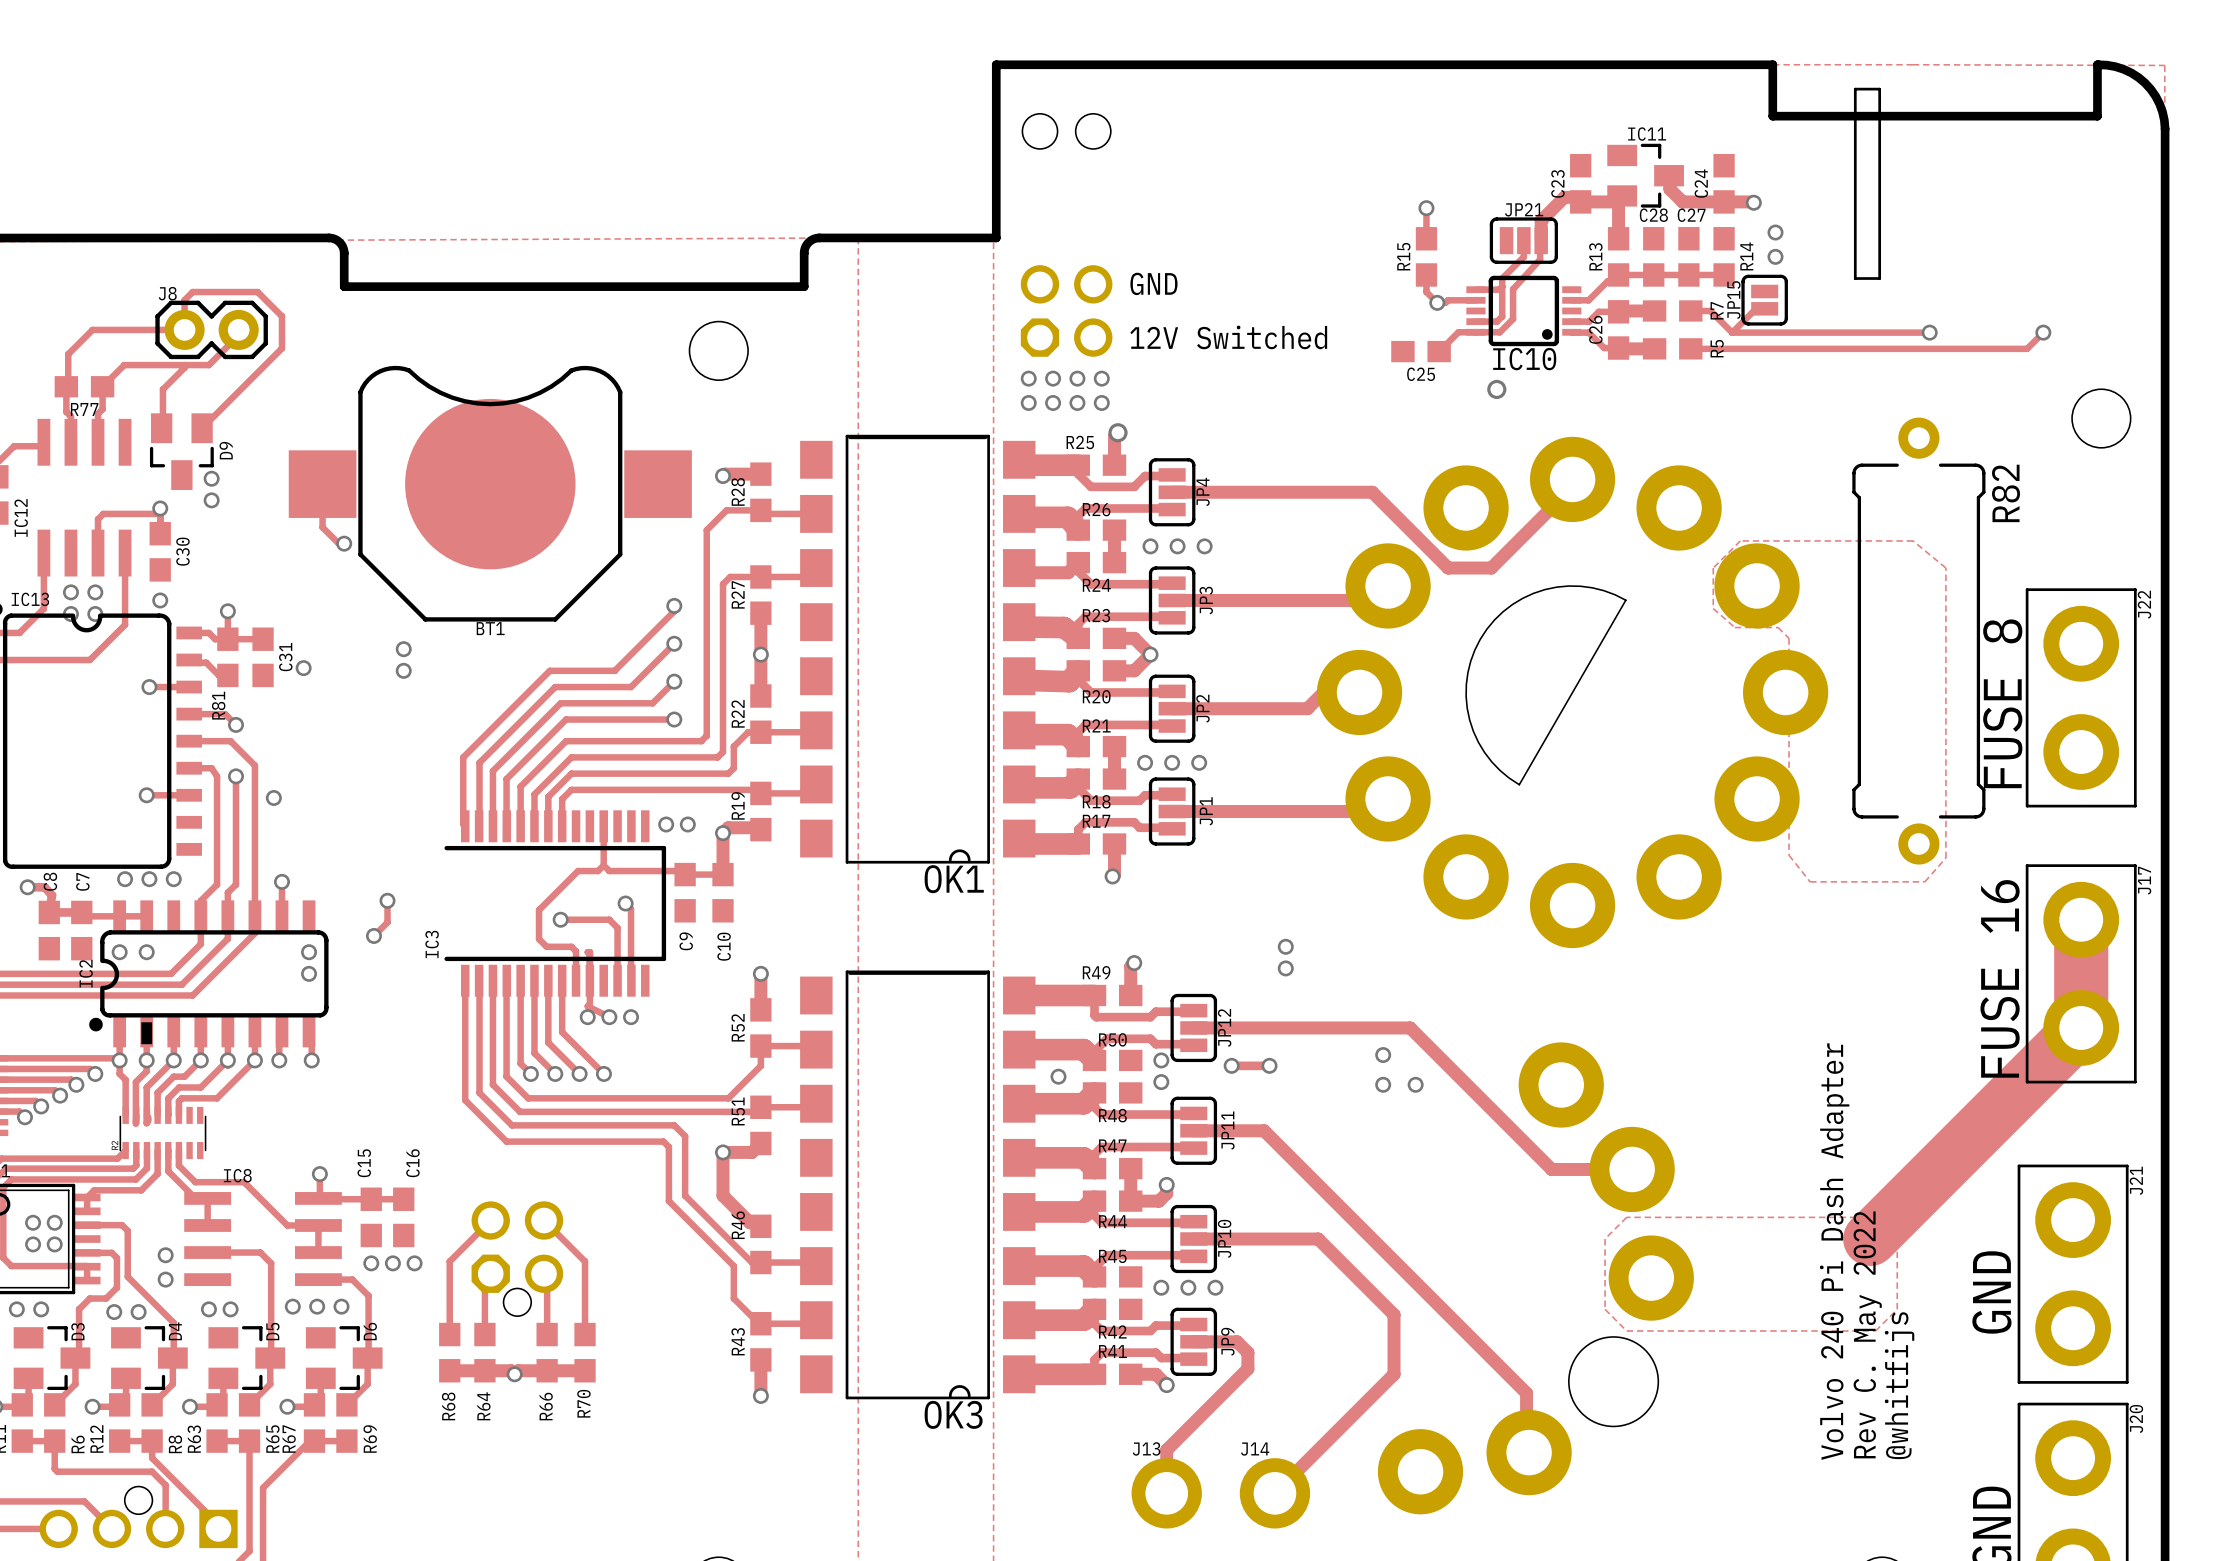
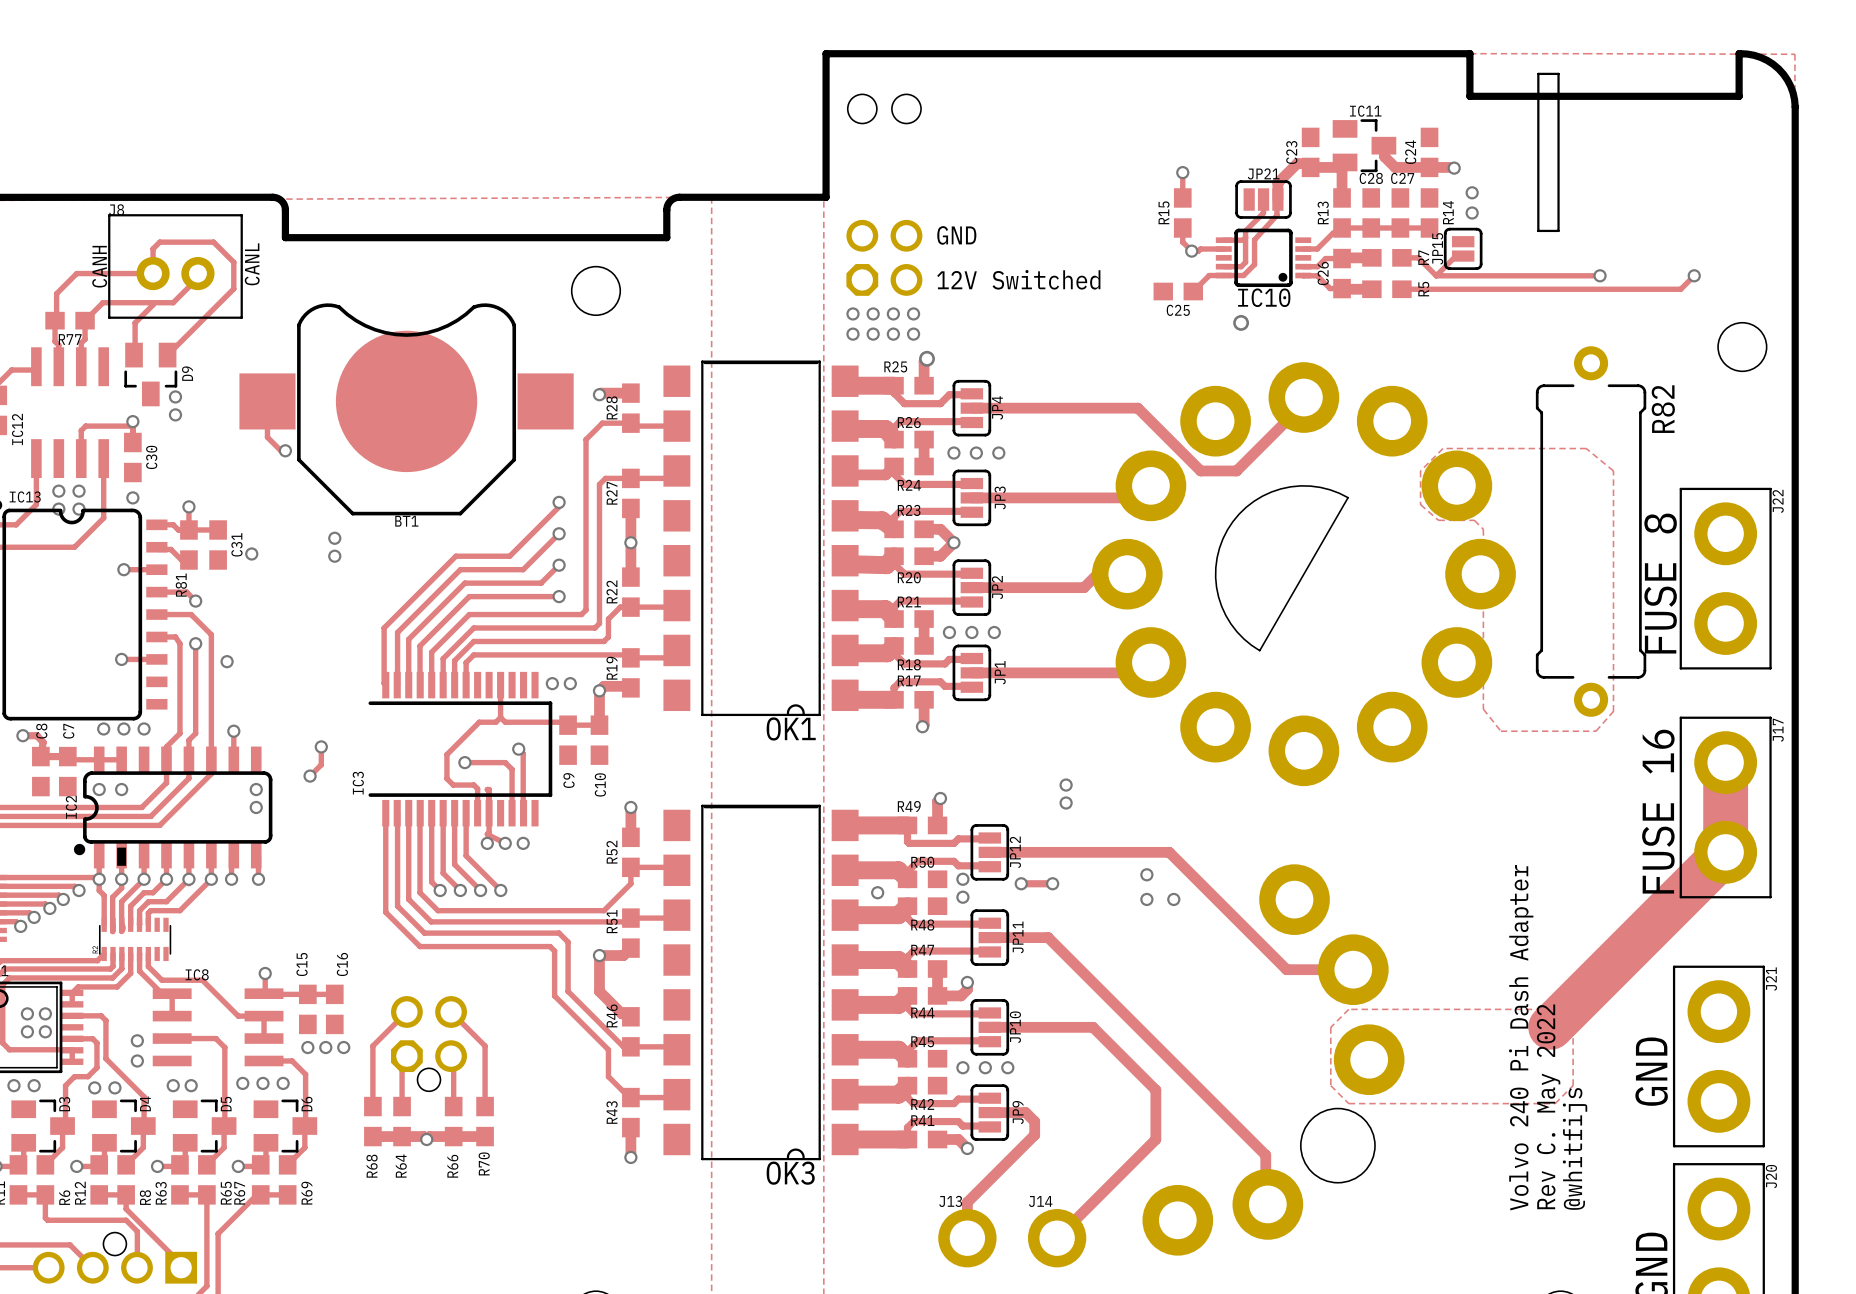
J8 footprint: [155, 300, 268, 360] -> [108, 214, 243, 319]
text: none -> CANL (252, 264)
text: none -> CANH (99, 266)

